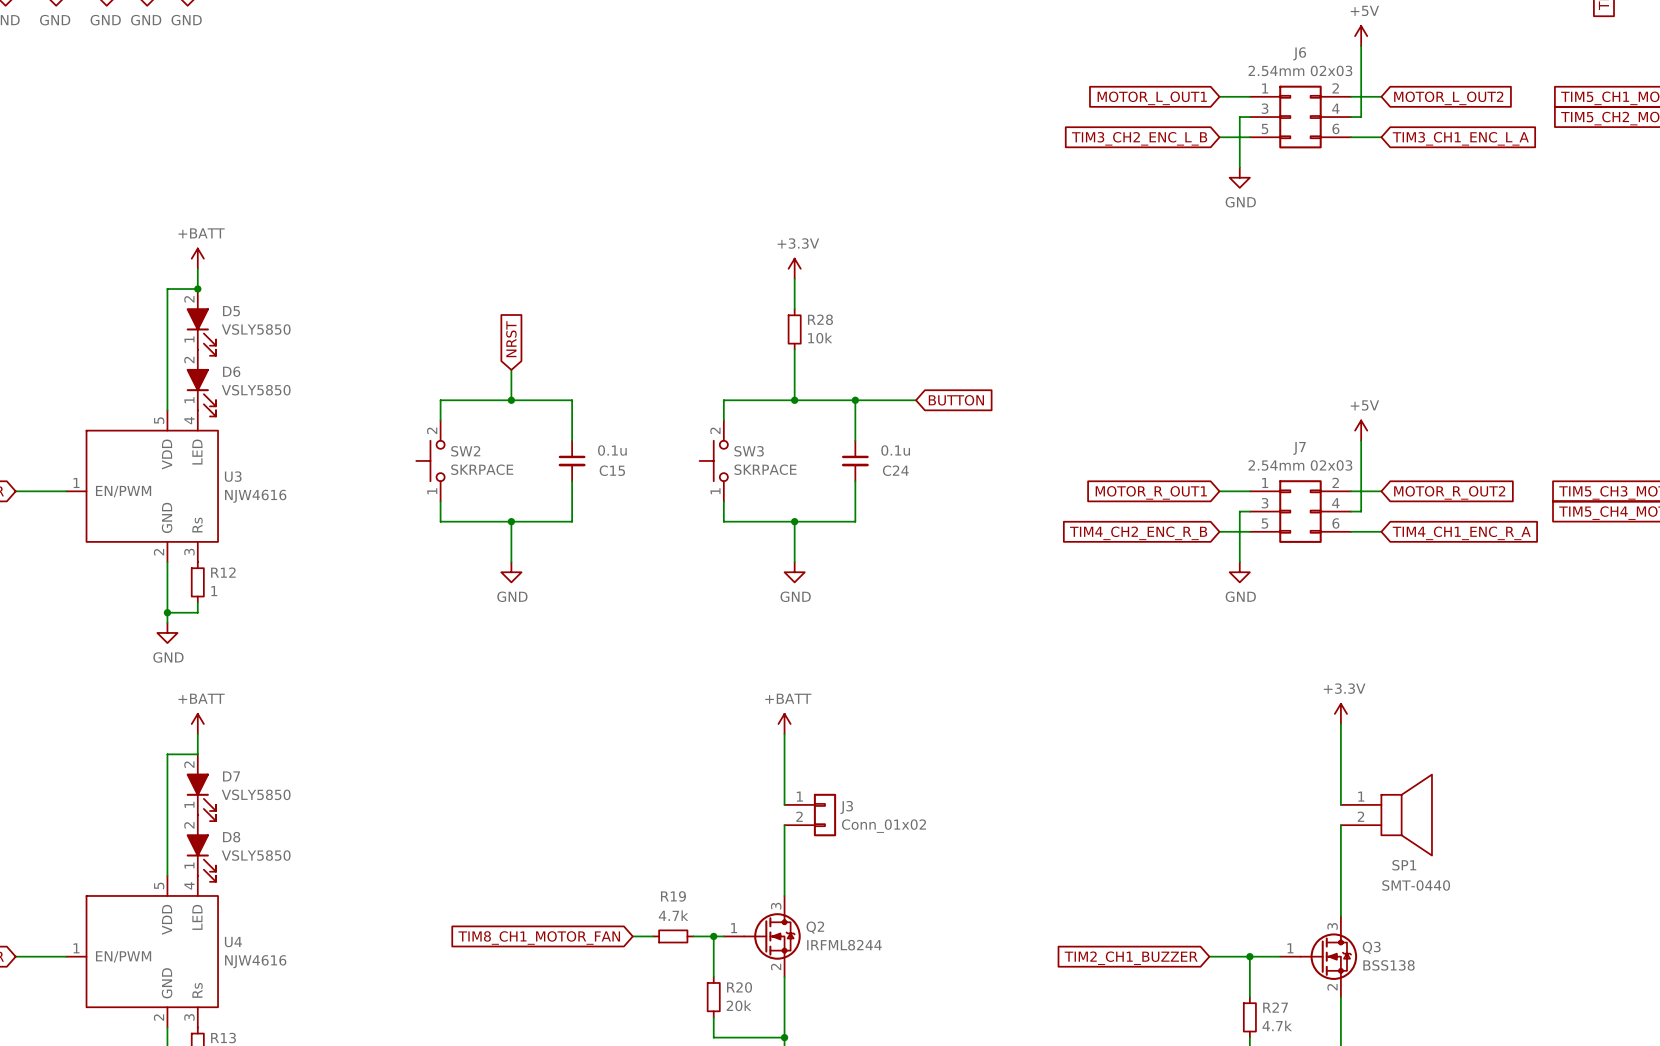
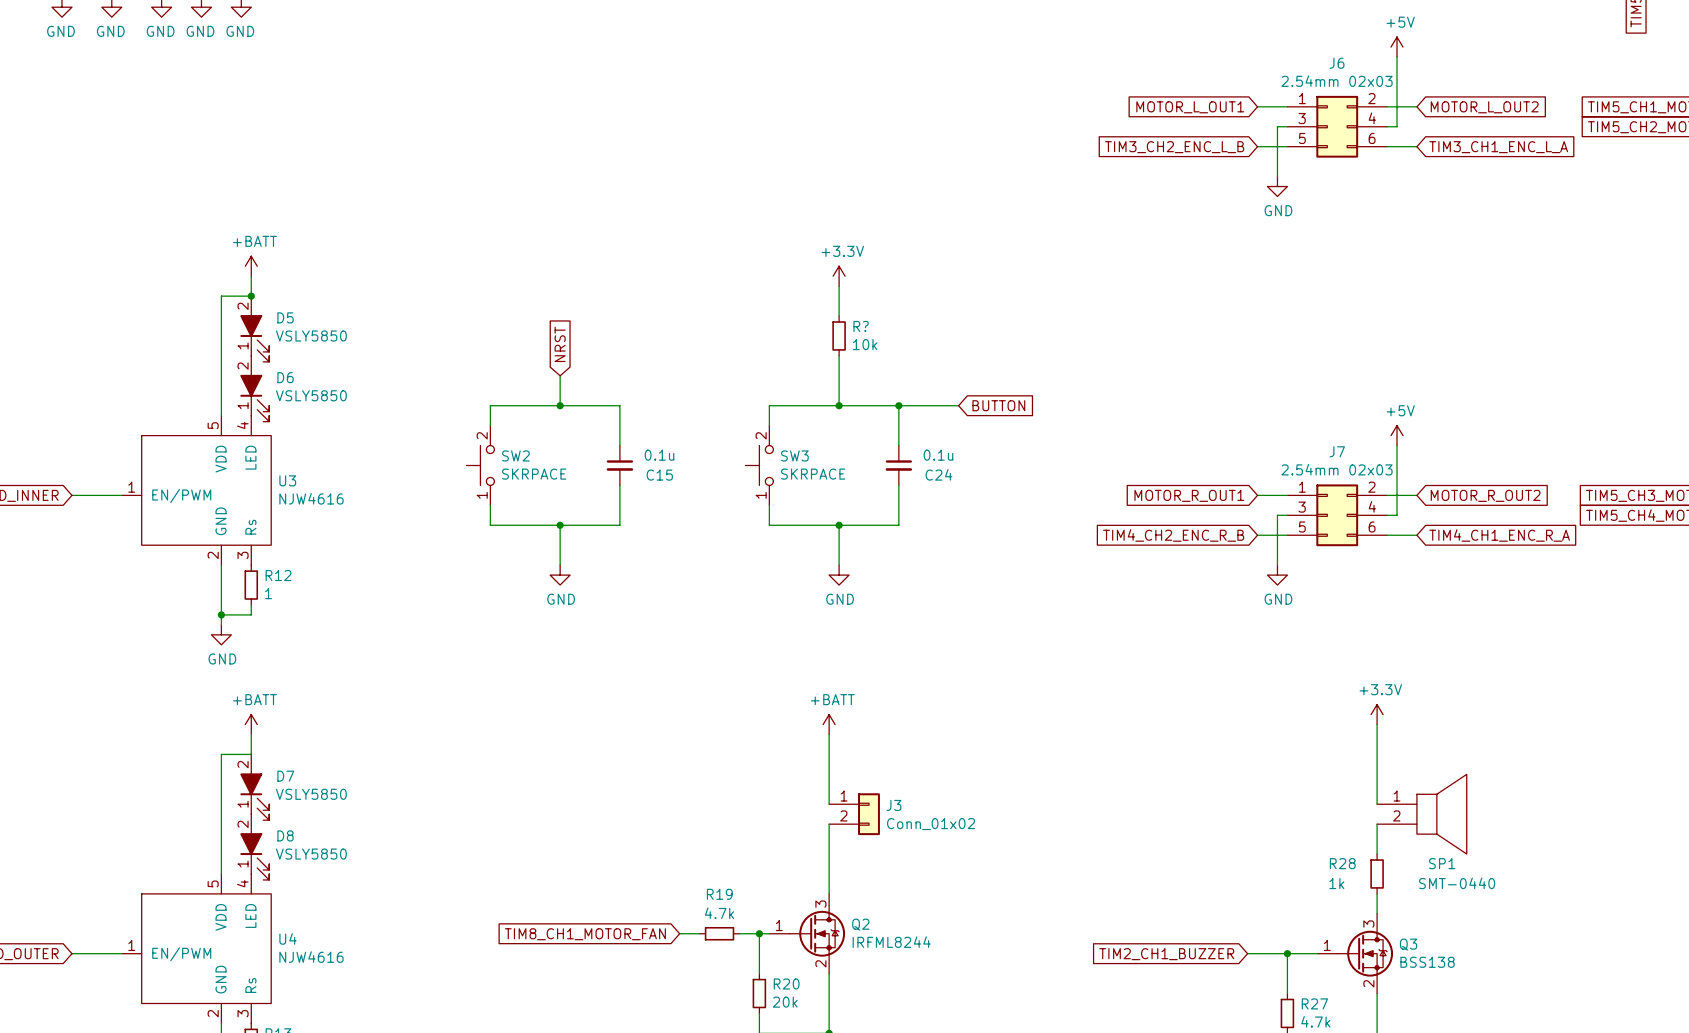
R28 name: R28 (820, 319) -> R? (861, 326)
wire: (1340, 855) (1340, 895) -> none
R28: none -> 1k (1377, 873)

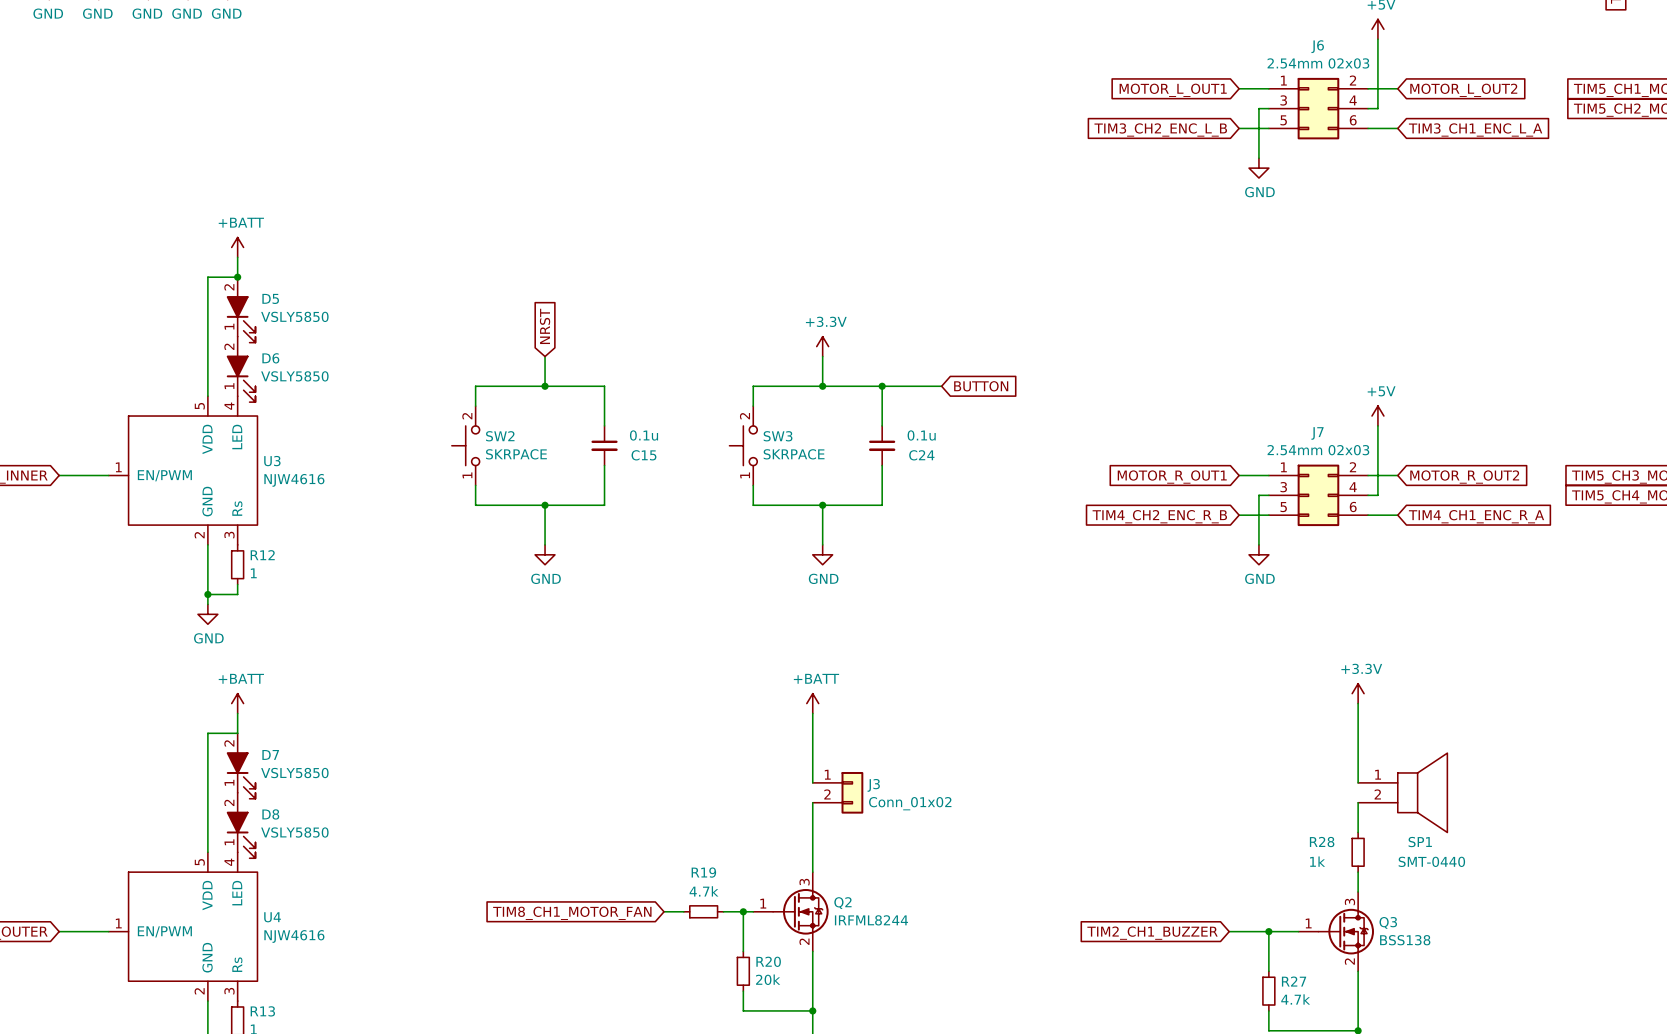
power symbol position: +3.3V (839, 276) -> +3.3V (822, 346)
wire: (839, 286) (839, 316) -> none
R?: 10k (839, 335) -> none

